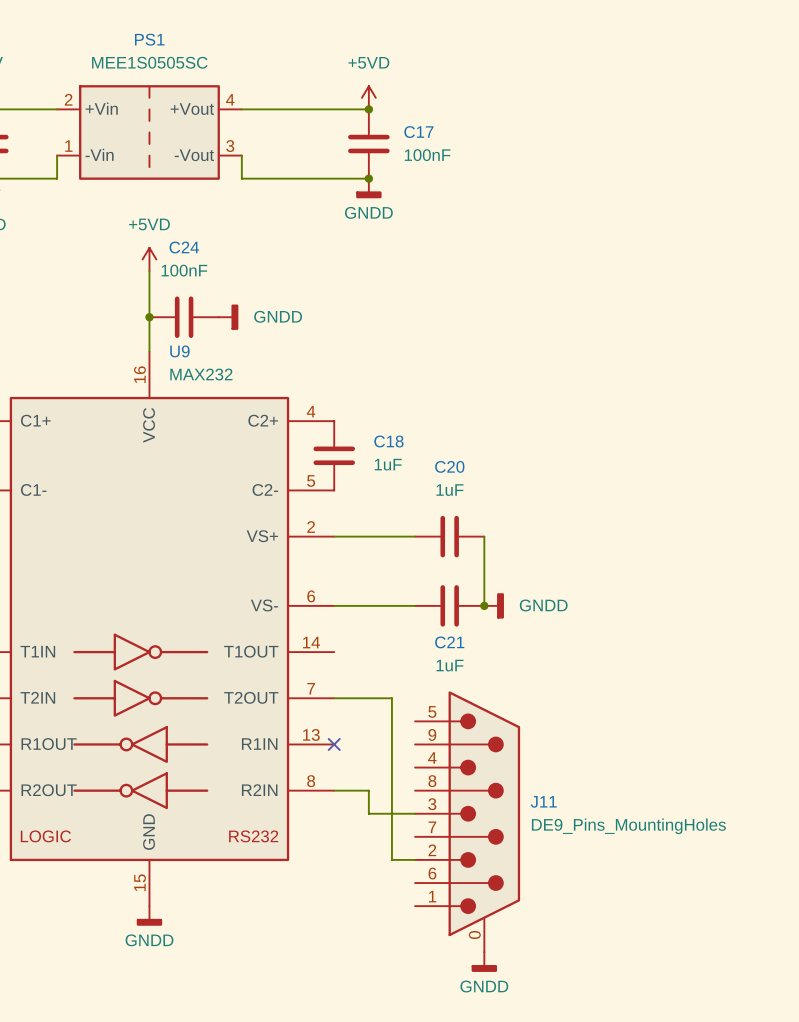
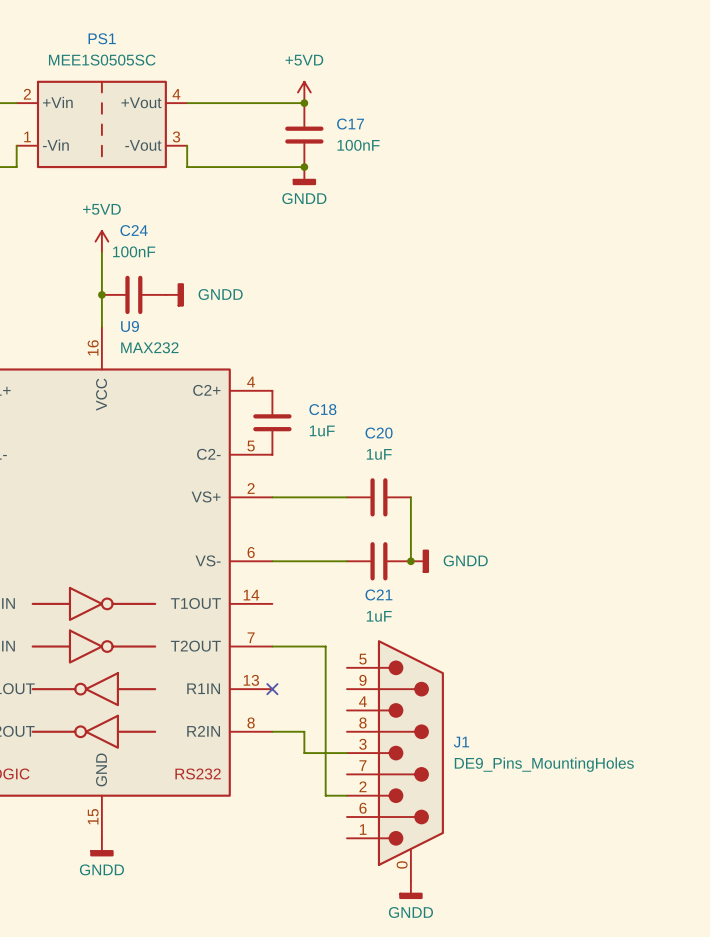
J11 name: J11 (543, 801) -> J1 (461, 742)

